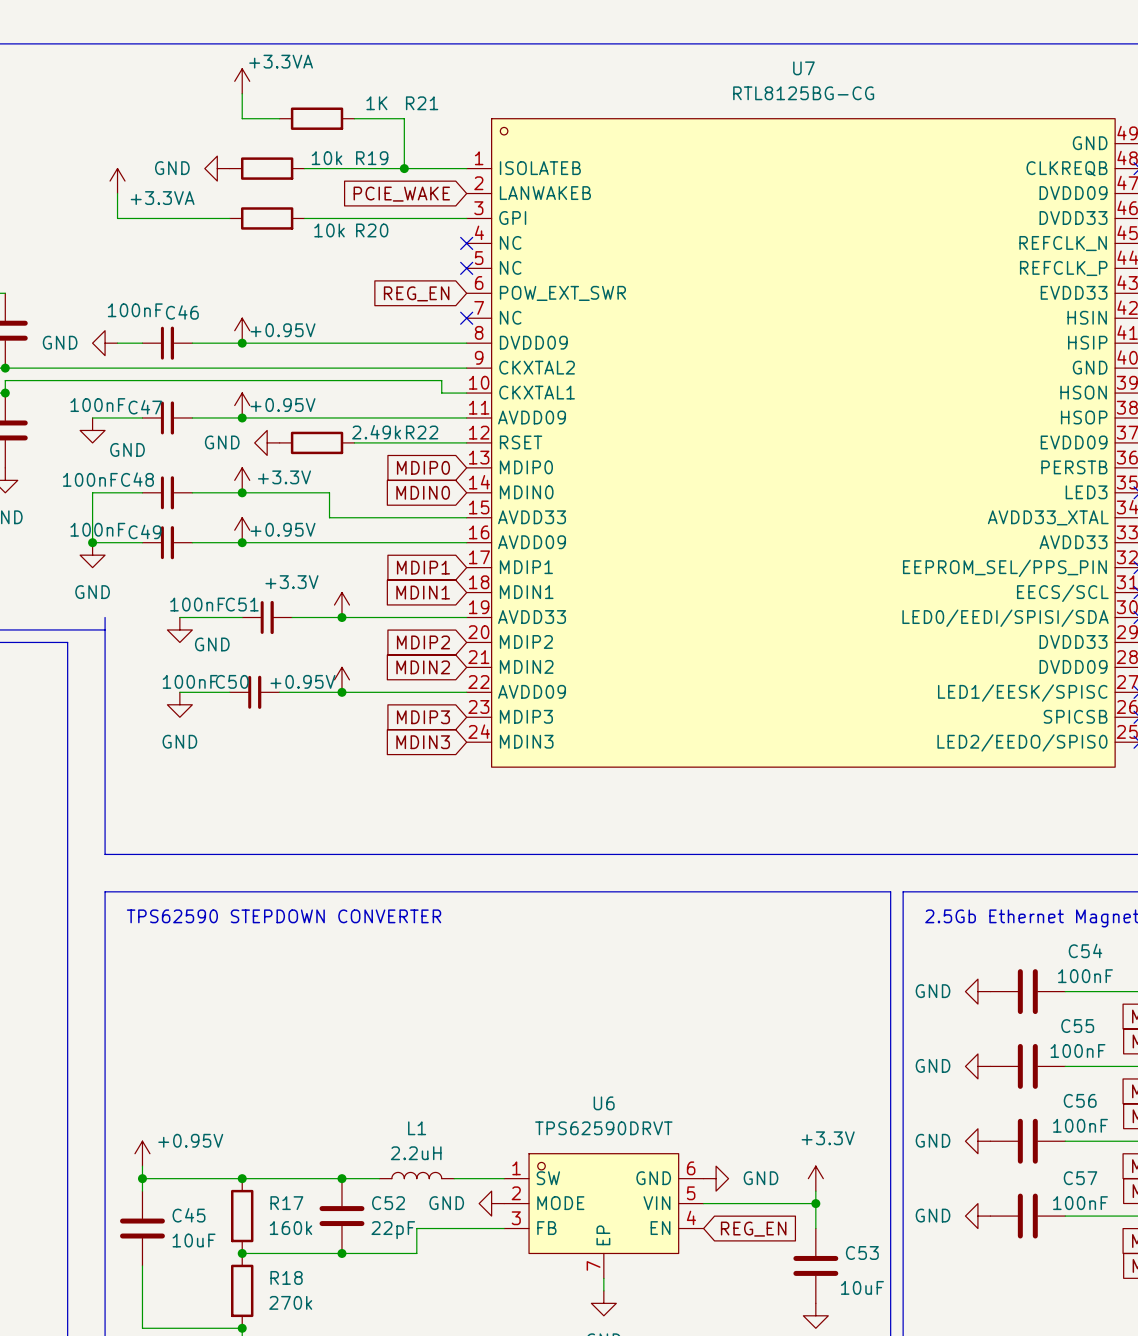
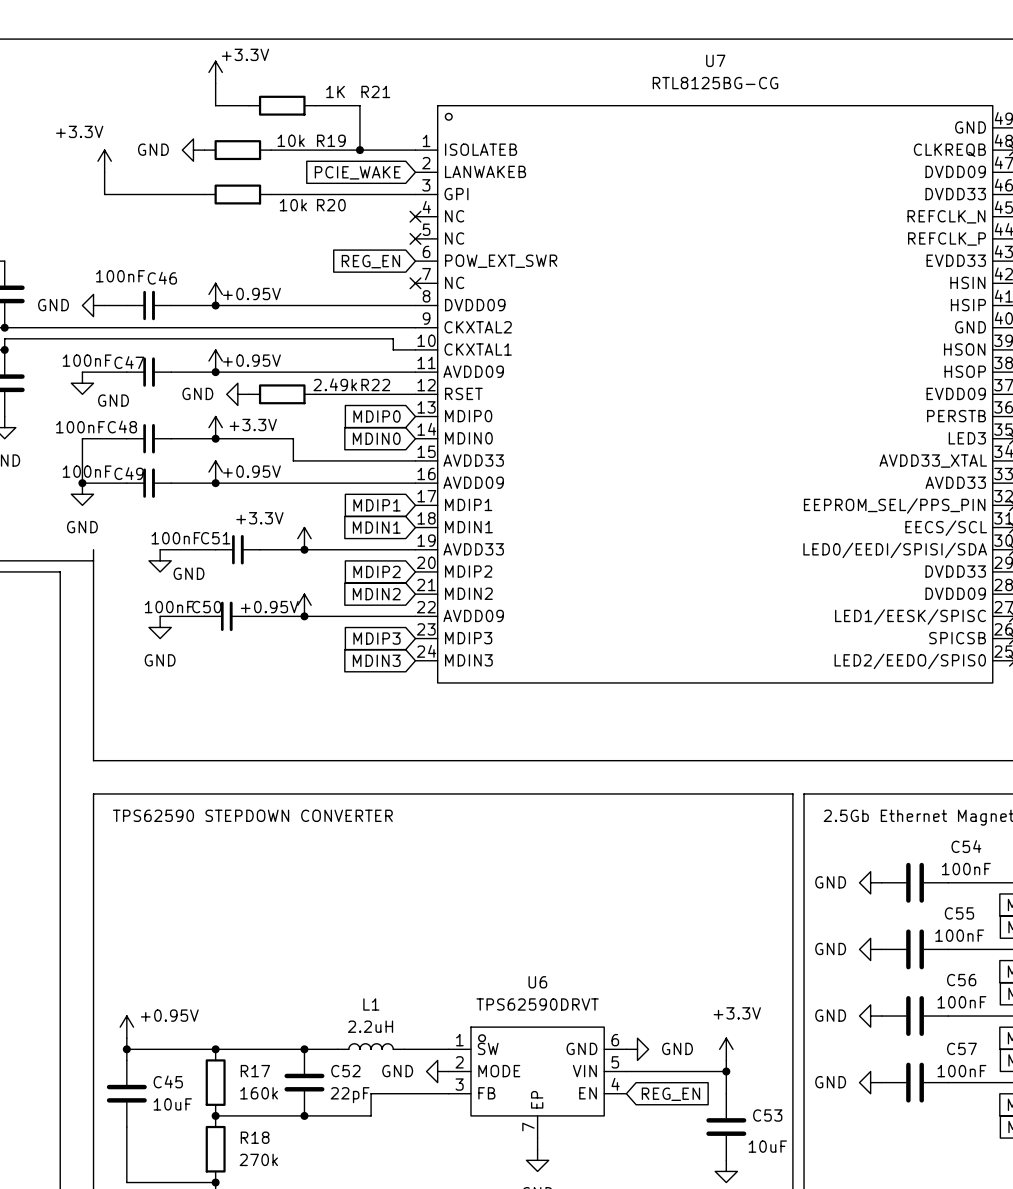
power symbol: +3.3VA (242, 81) -> +3.3V (215, 72)
power symbol: +3.3VA (117, 181) -> +3.3V (104, 161)

